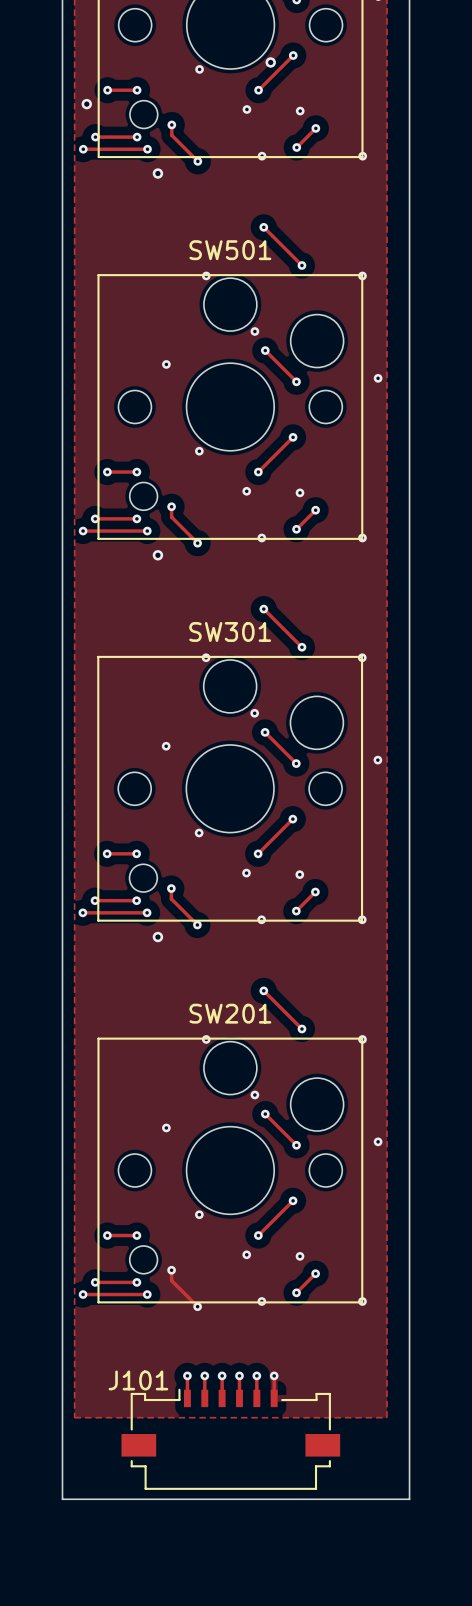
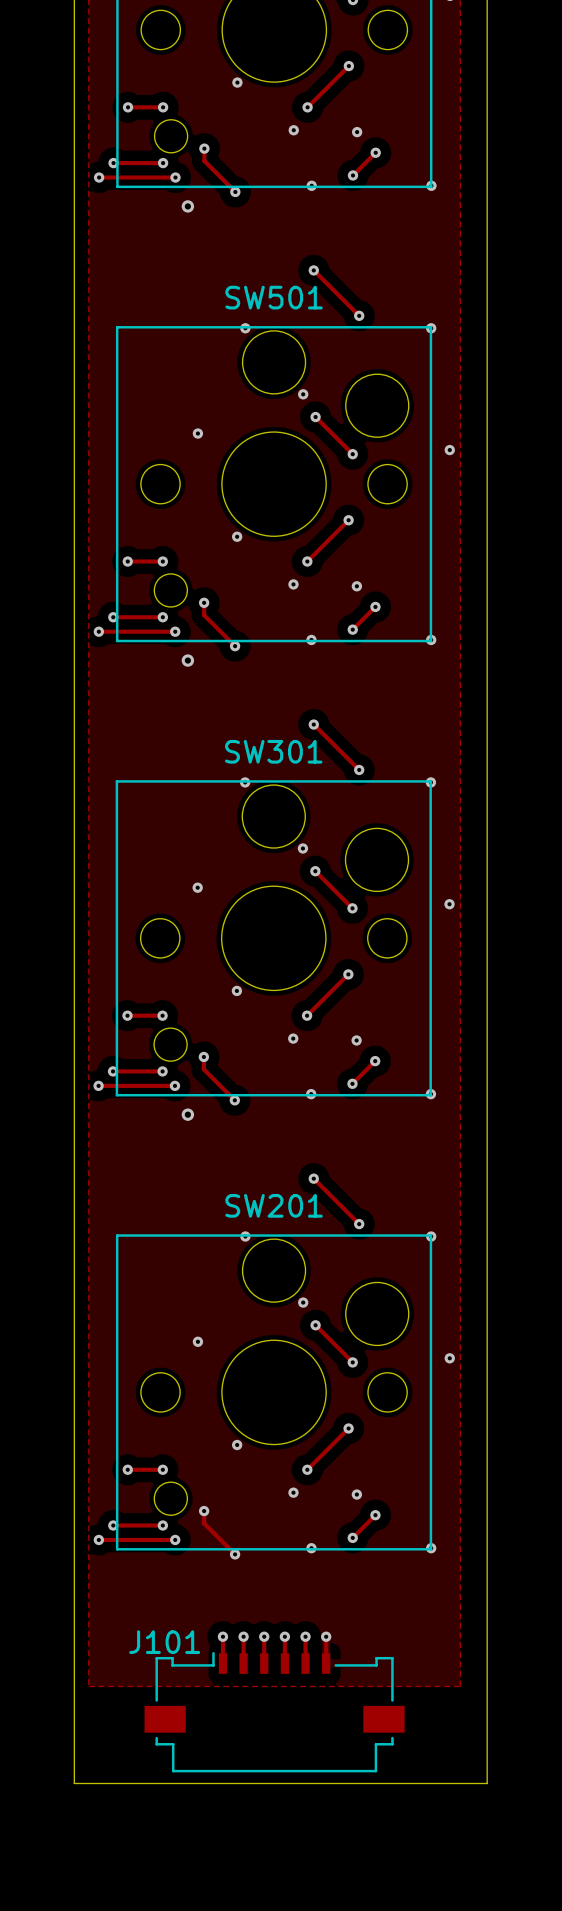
via: (270, 62) -> none
via: (86, 104) -> none

